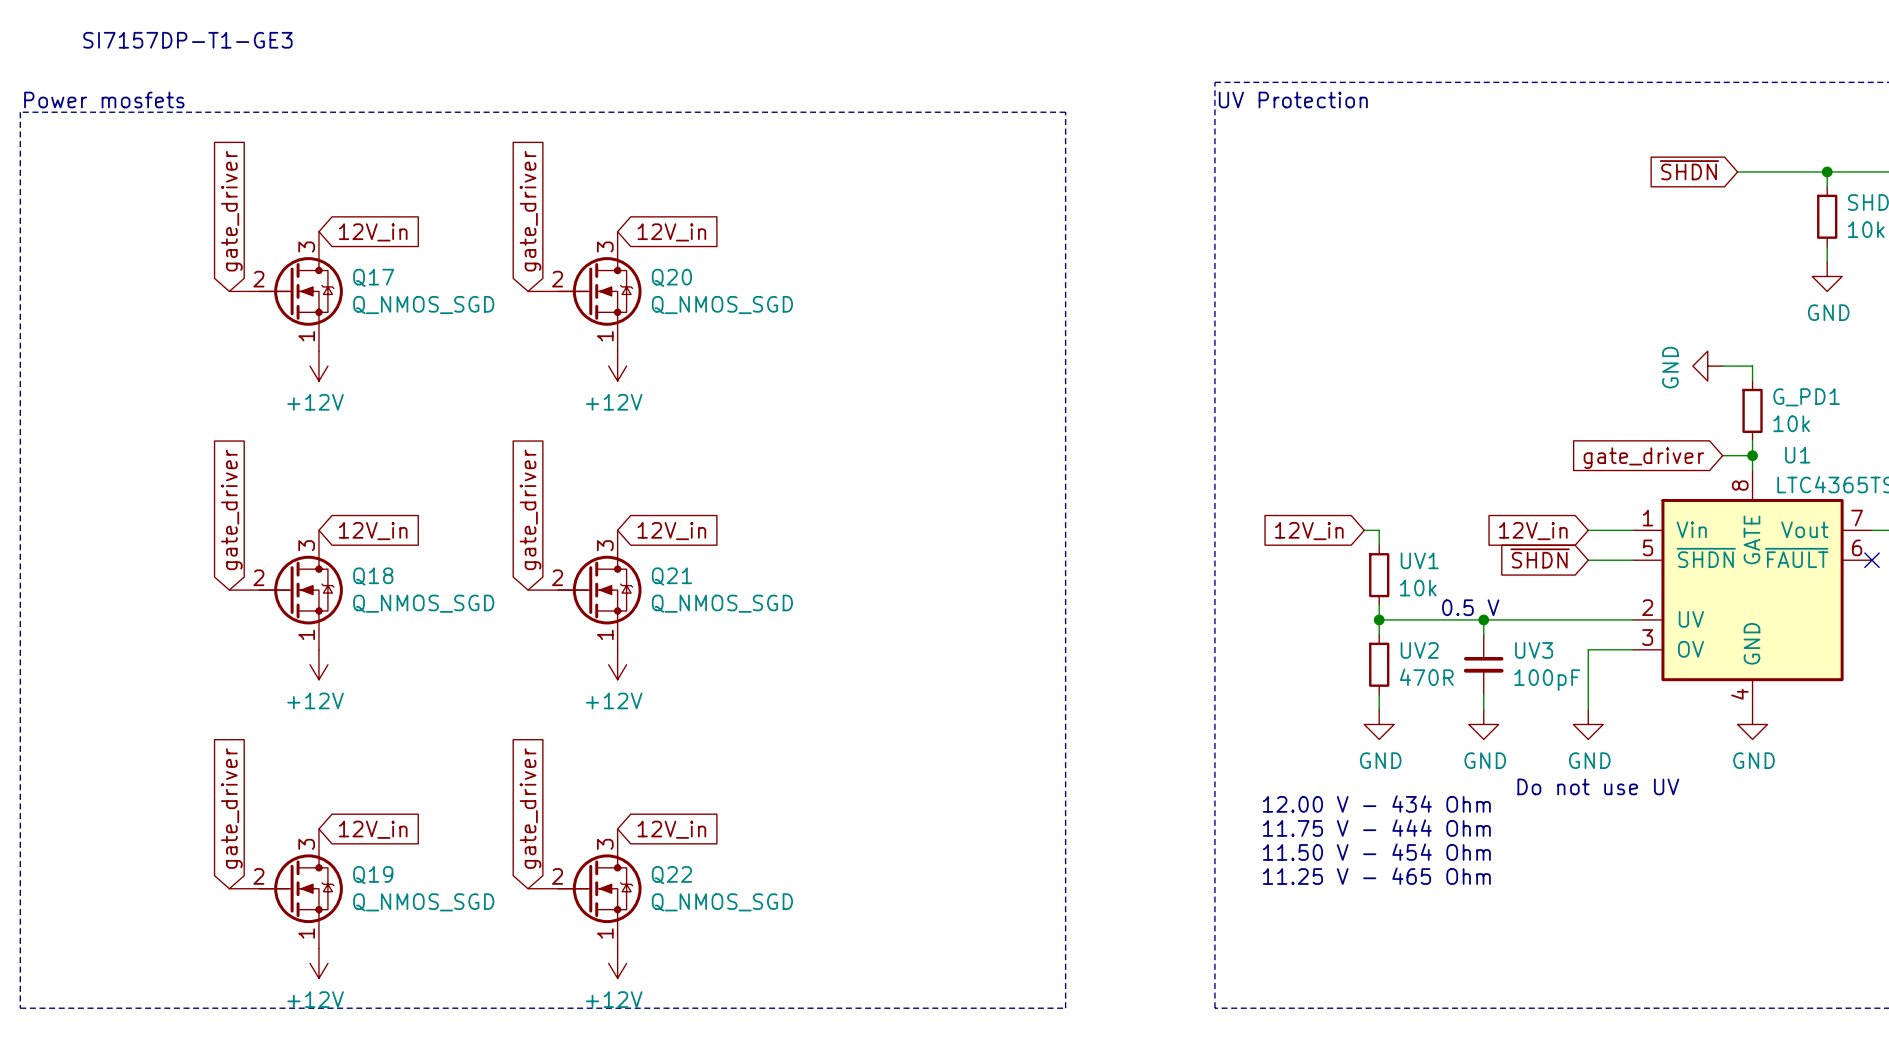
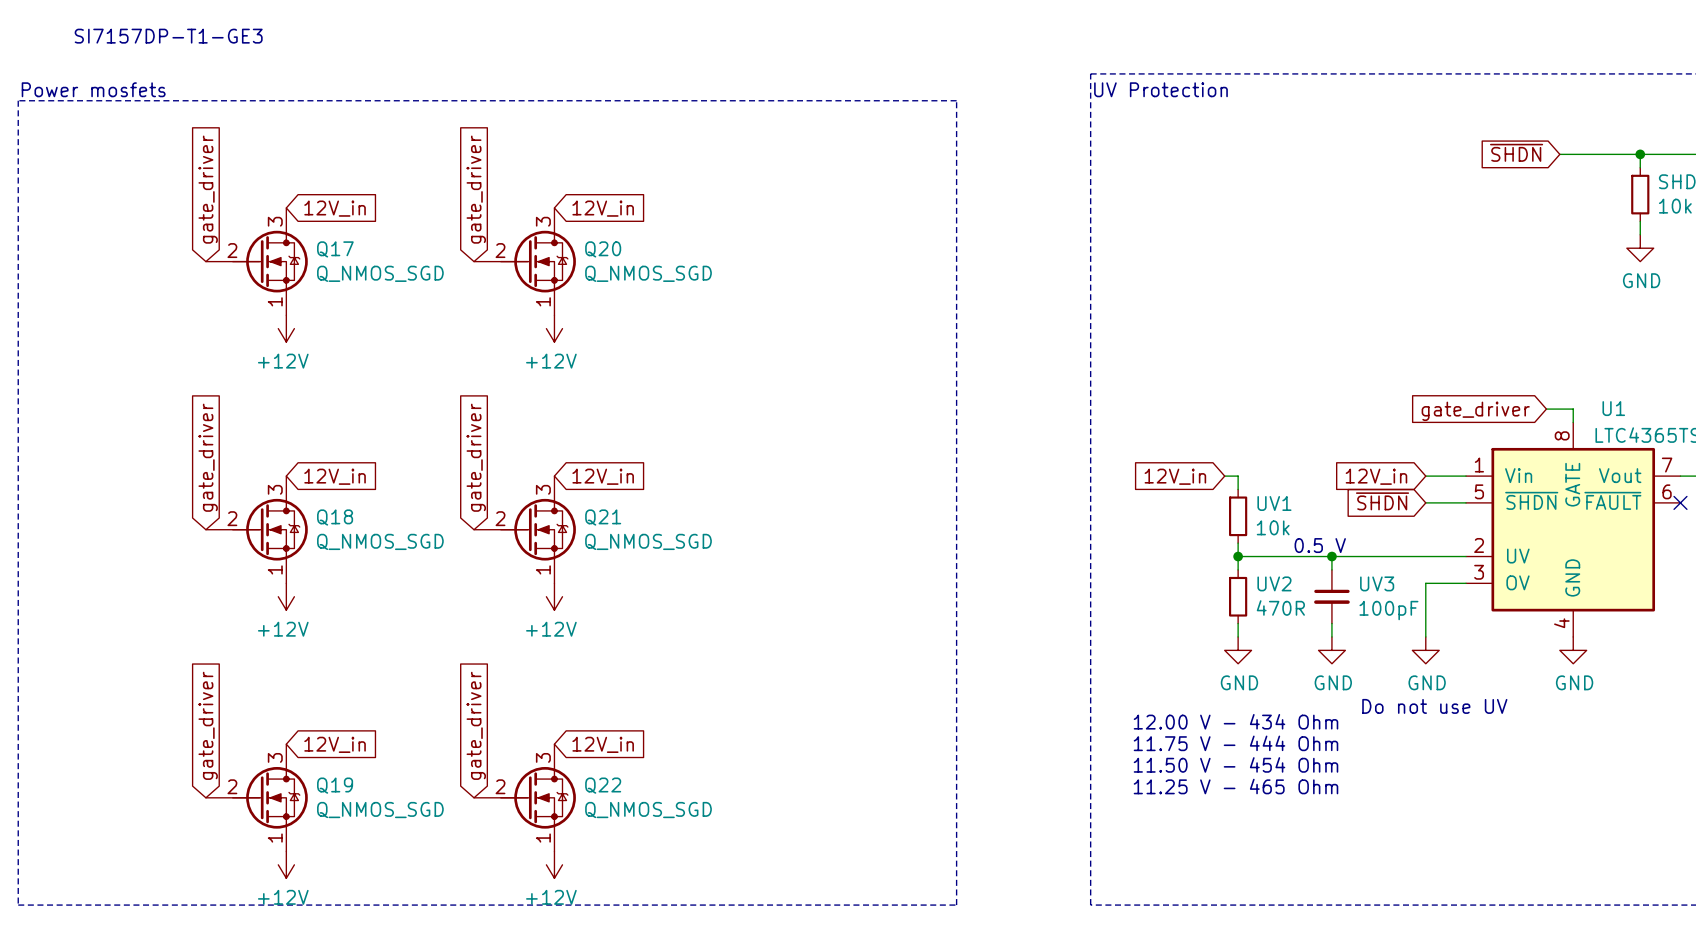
power symbol: GND (1707, 366) -> none
wire: (1722, 366) (1752, 366) (1752, 381) -> none
G_PD1: 10k (1752, 410) -> none
wire: (1752, 440) (1752, 455) -> none
junction: (1752, 455) -> none

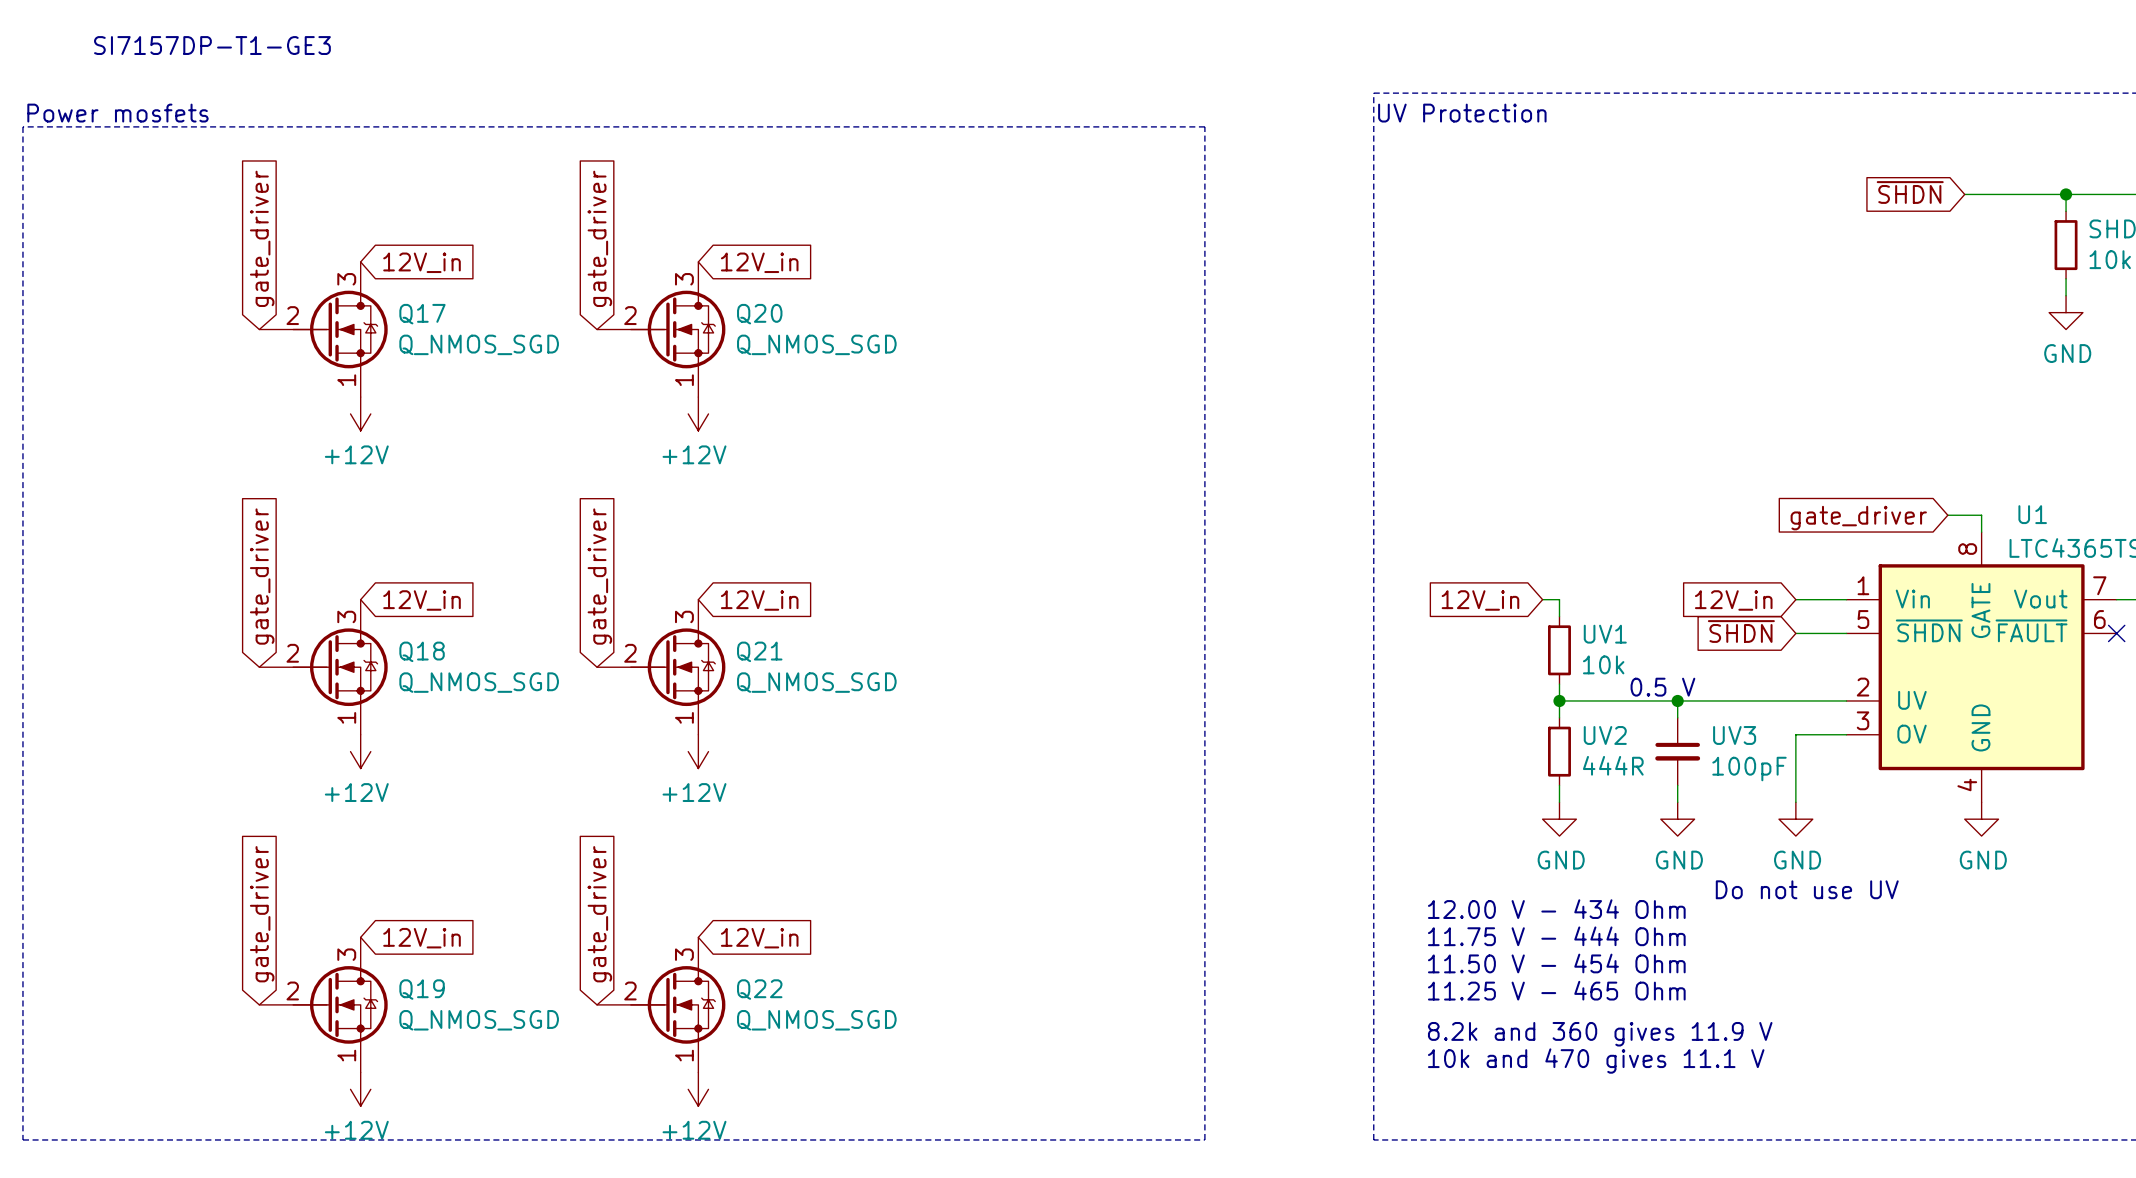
UV2 value: 470R (1280, 607) -> 444R (1613, 765)
text: none -> 8.2k and 360 gives 11.9 V (1600, 1034)
text: none -> 10k and 470 gives 11.1 V (1596, 1061)

